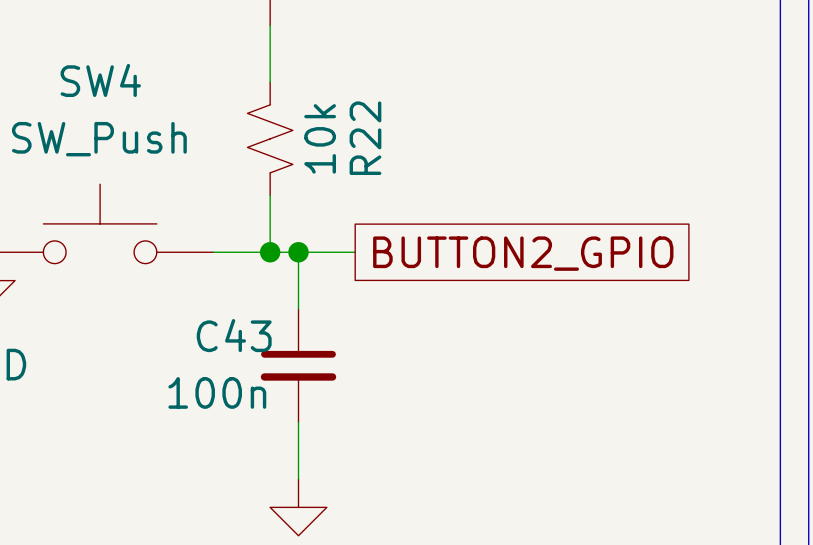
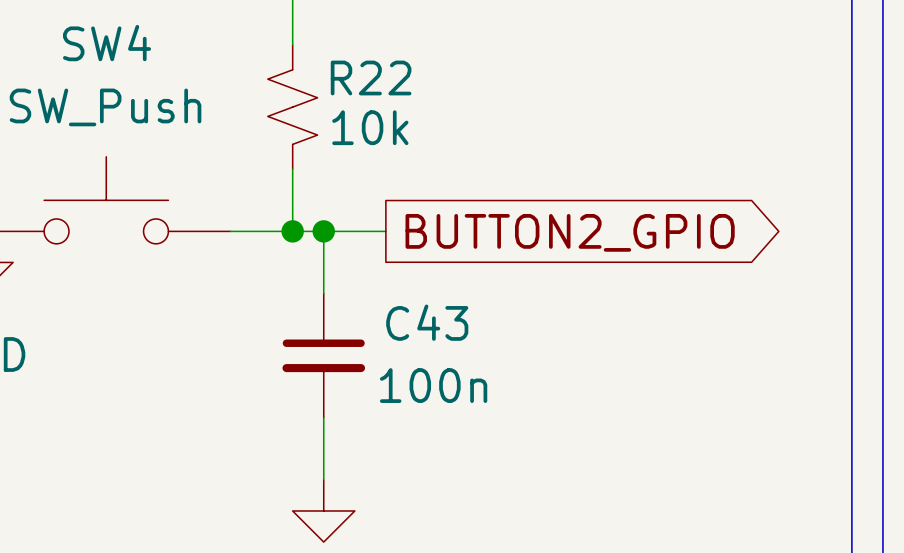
R22 value rotation: 0° (320, 138) -> 90° clockwise (370, 127)
R22 name rotation: 0° (365, 138) -> 90° clockwise (371, 77)
global label shape: passive (523, 253) -> output (570, 232)
C43 name position: C43 (234, 335) -> C43 (427, 322)
C43 value position: 100n (217, 392) -> 100n (433, 385)

